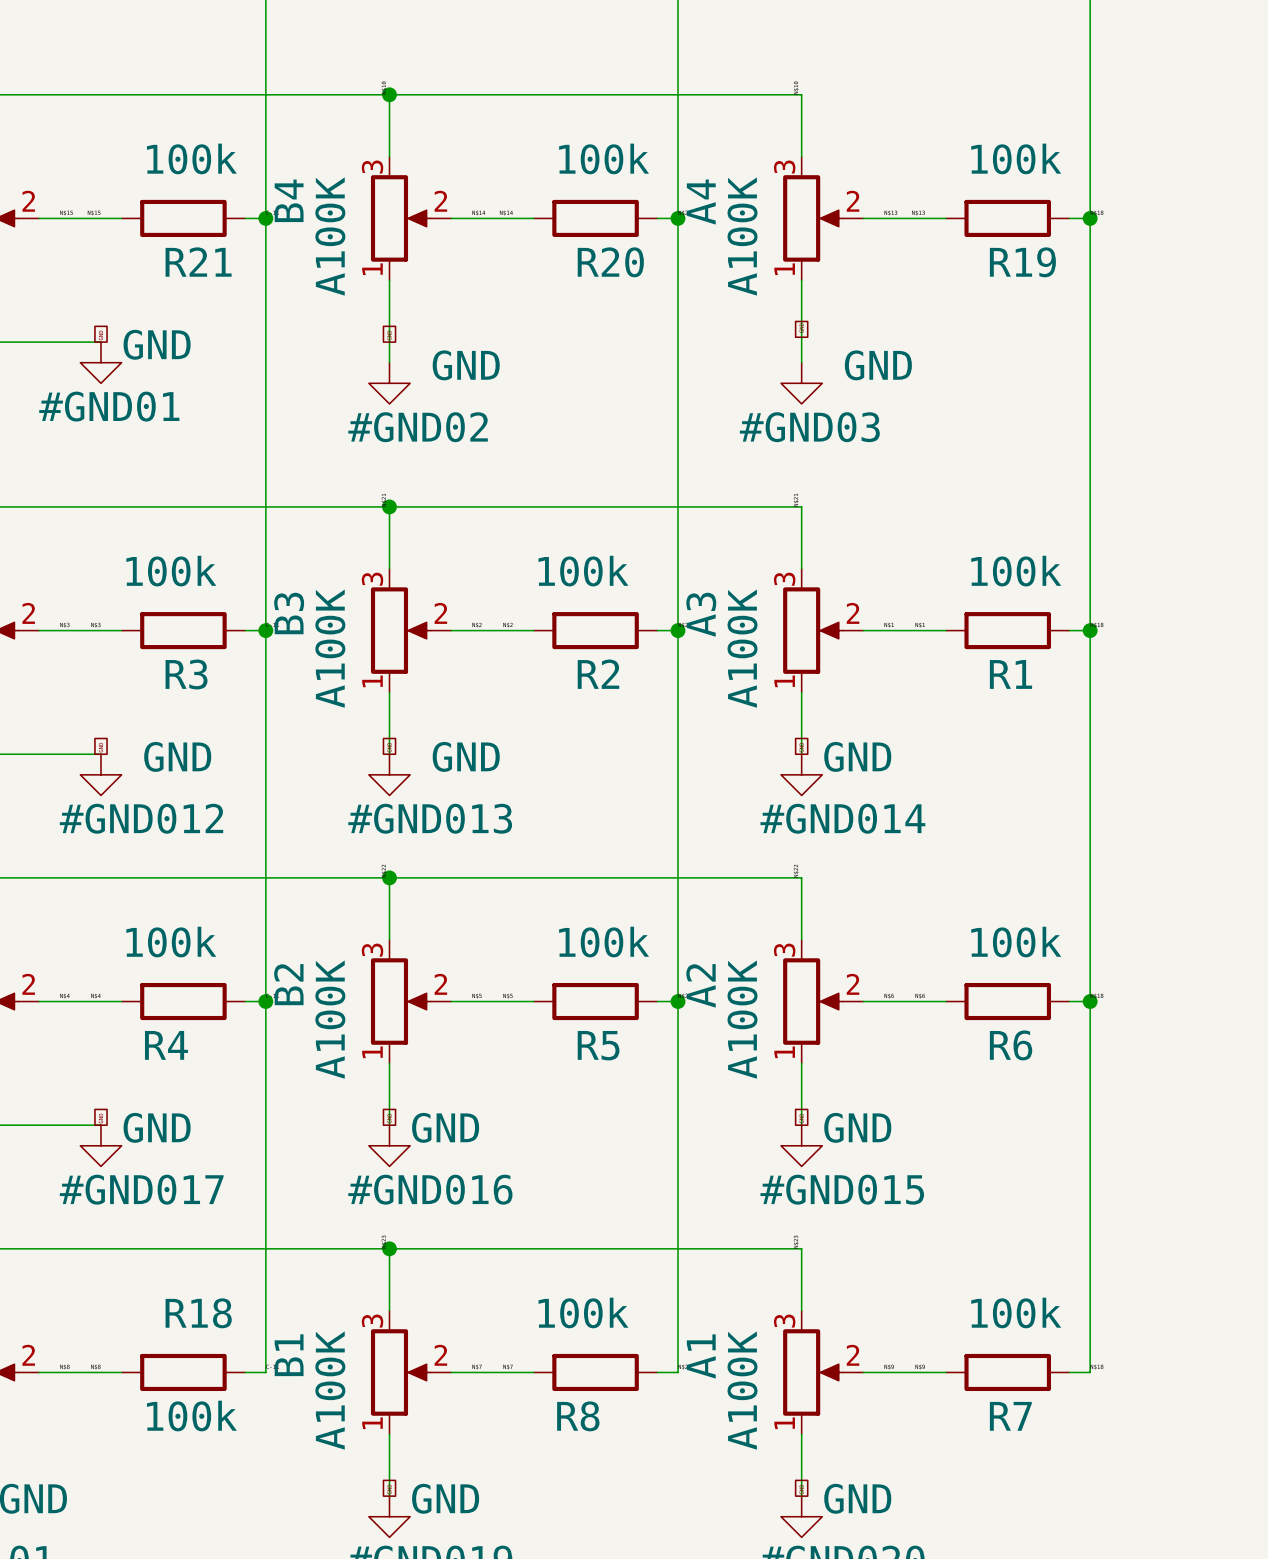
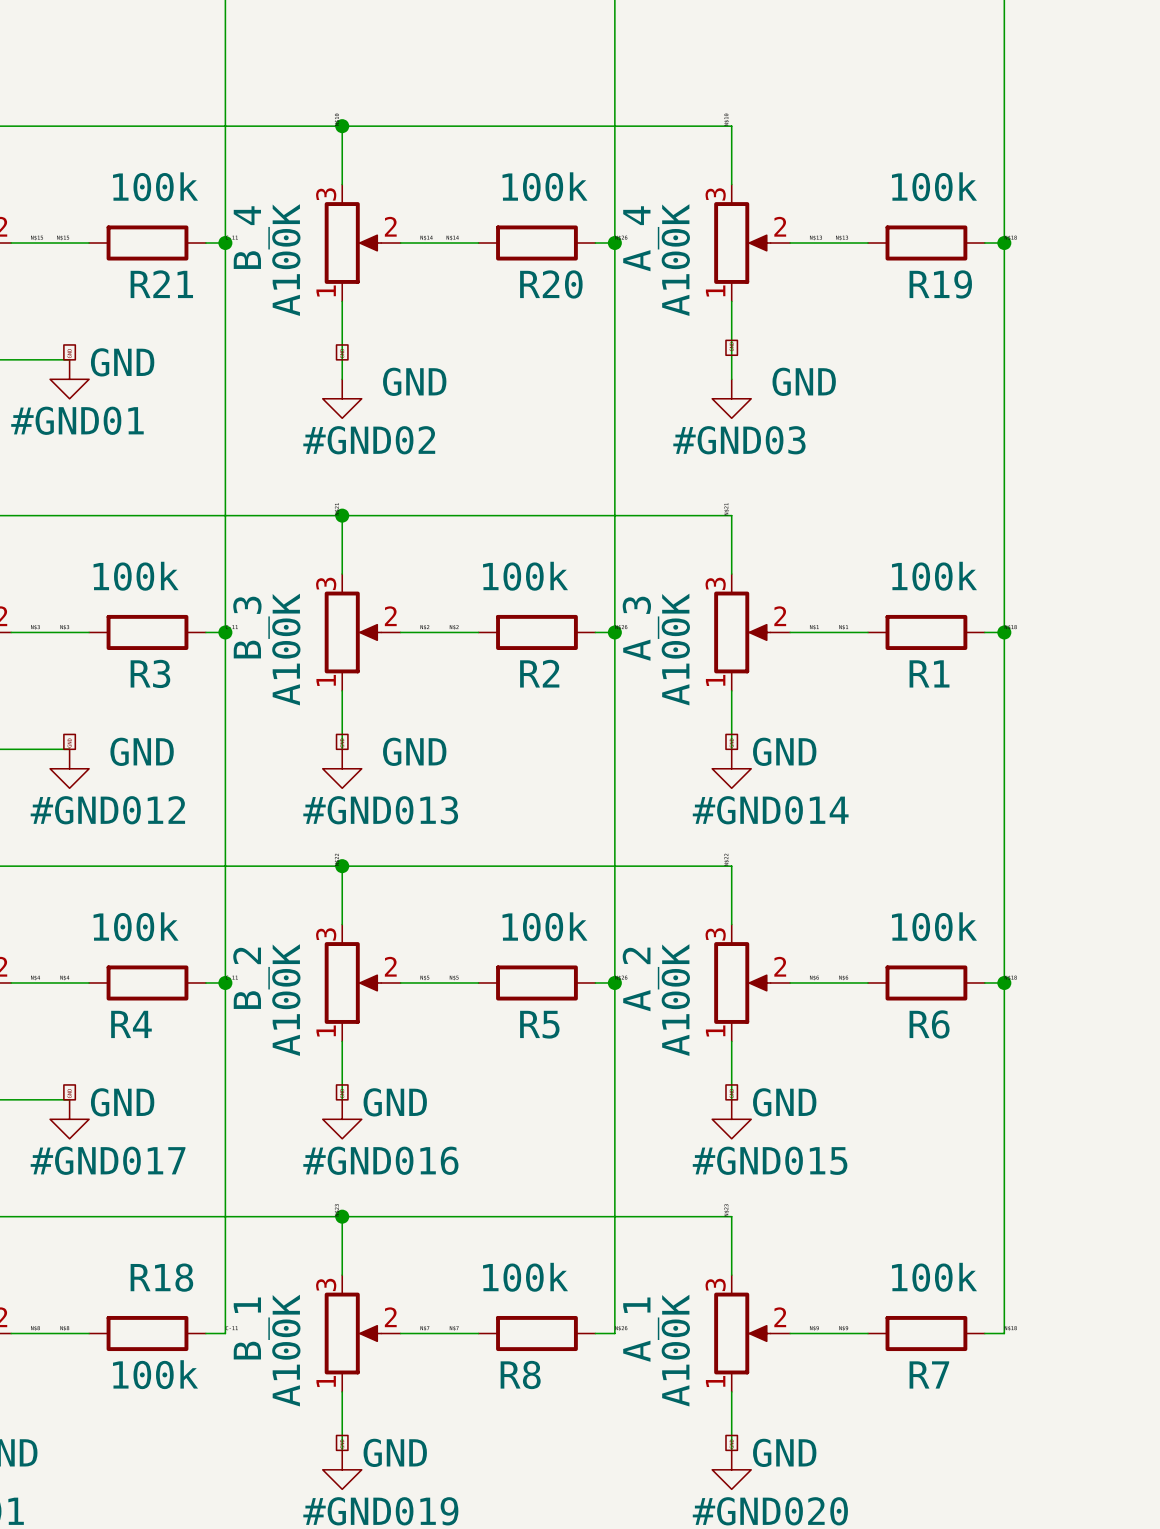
B4 name: B4 (289, 200) -> B_4 (251, 237)
A4 name: A4 (701, 202) -> A_4 (641, 238)
B3 name: B3 (289, 613) -> B_3 (251, 627)
A3 name: A3 (701, 614) -> A_3 (641, 628)
B2 name: B2 (288, 984) -> B_2 (251, 978)
A2 name: A2 (701, 985) -> A_2 (641, 979)
B1 name: B1 (289, 1355) -> B_1 (251, 1328)
A1 name: A1 (701, 1356) -> A_1 (641, 1329)

